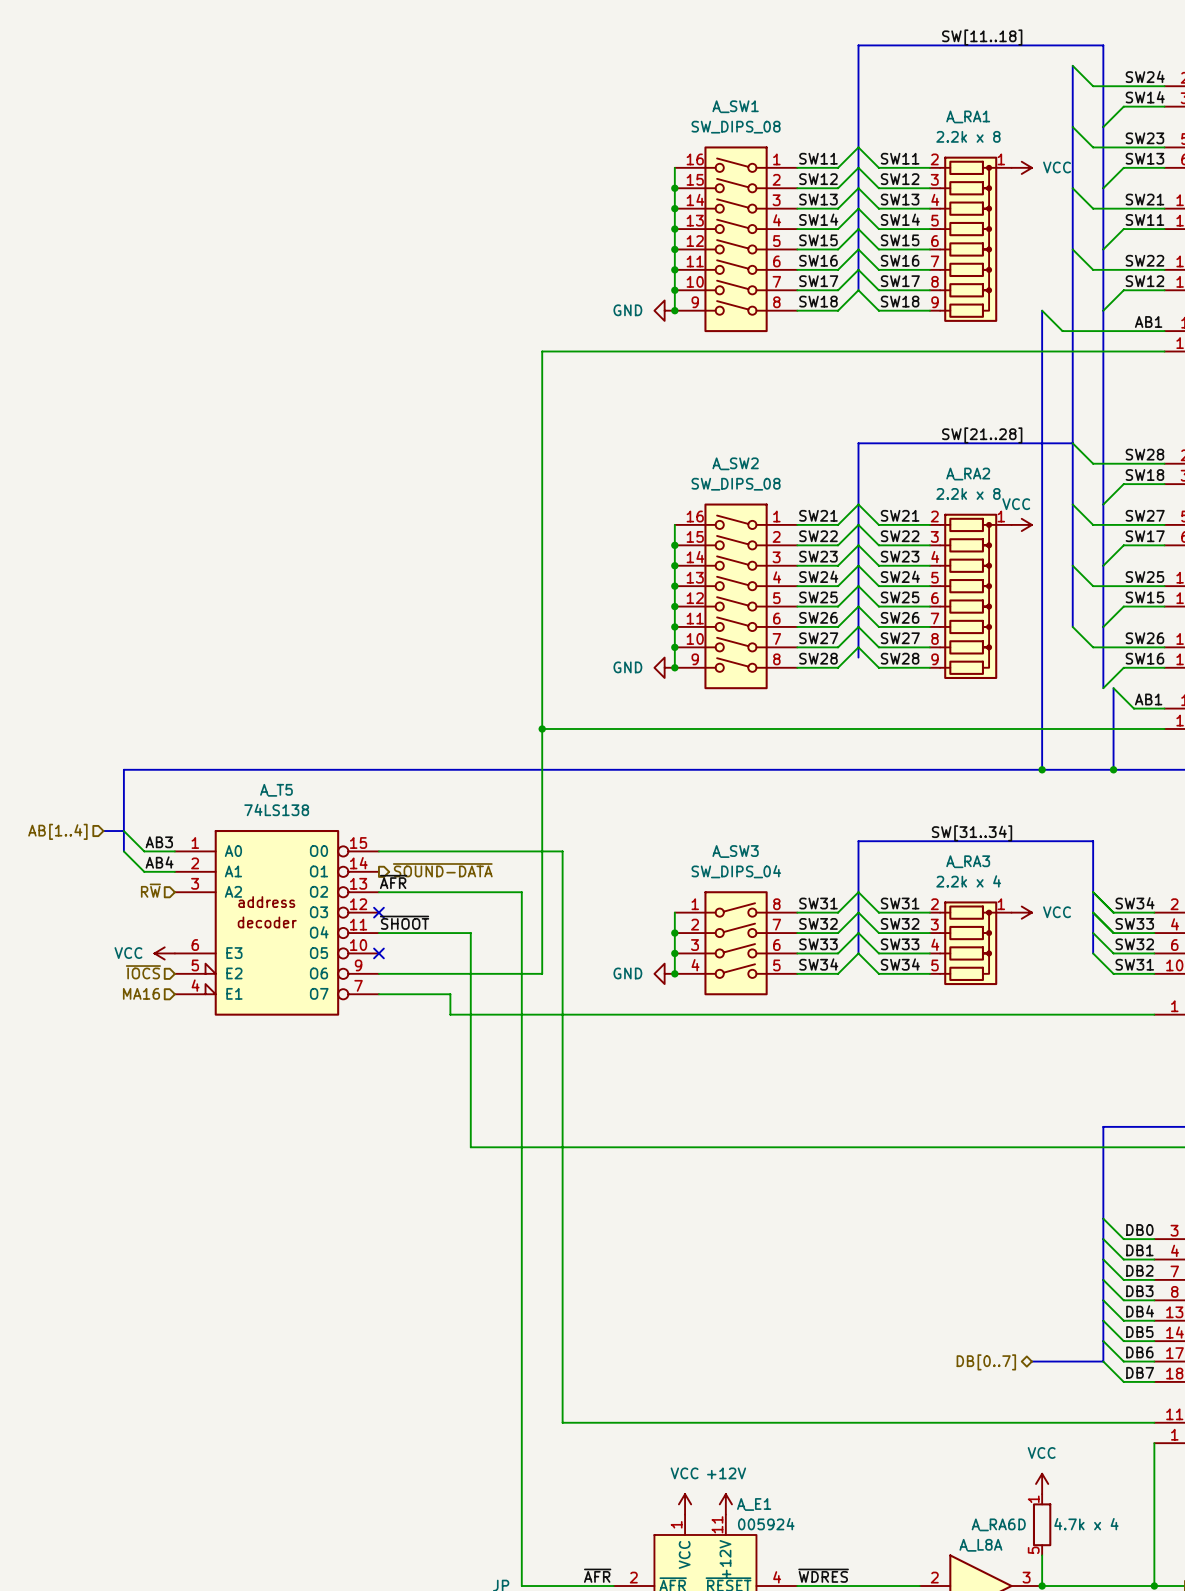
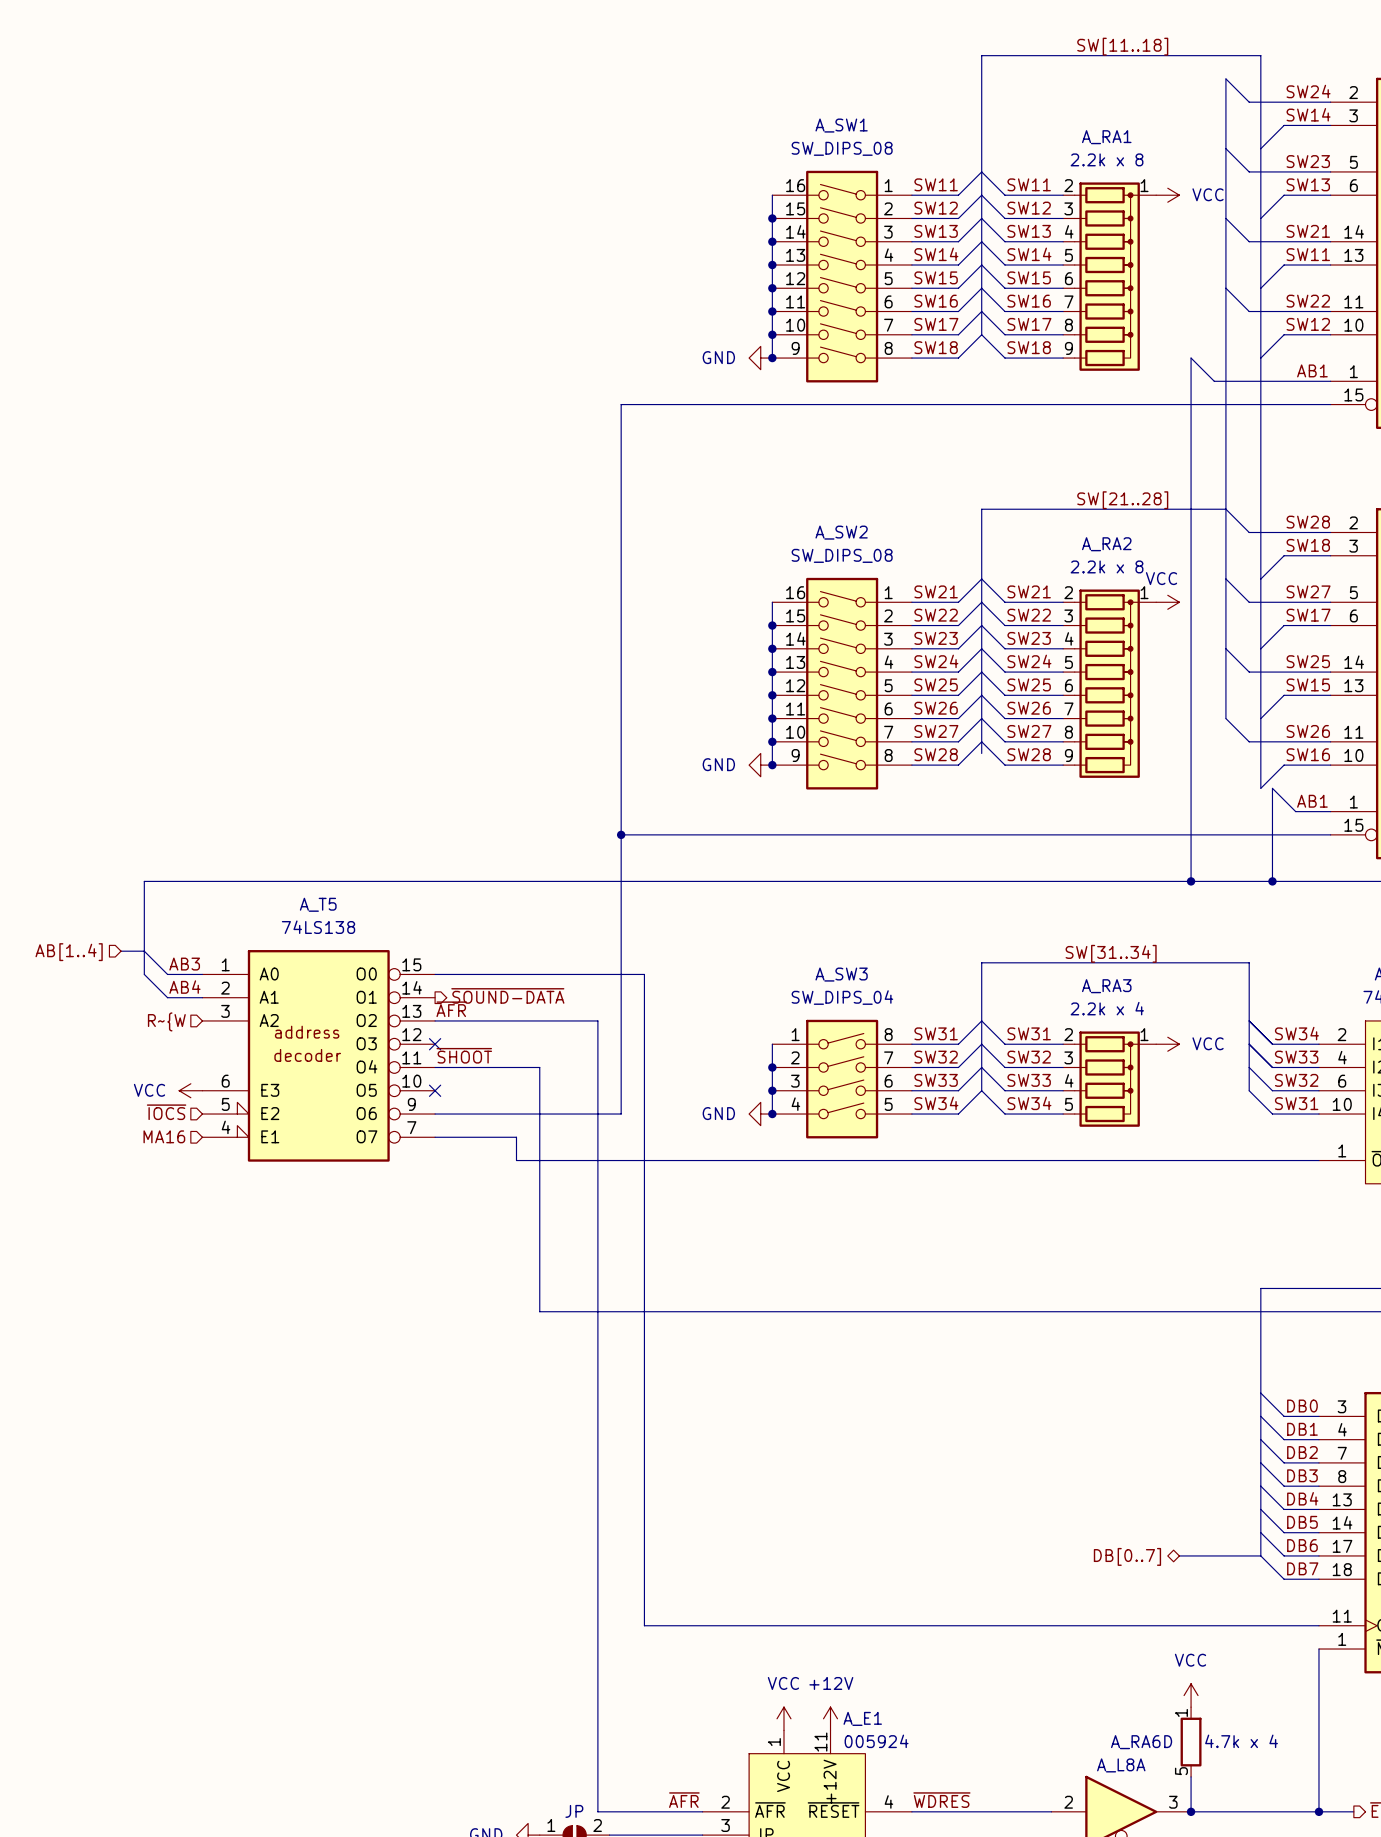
hierarchical label: R~{W} (150, 890) -> R~{W (166, 1021)

